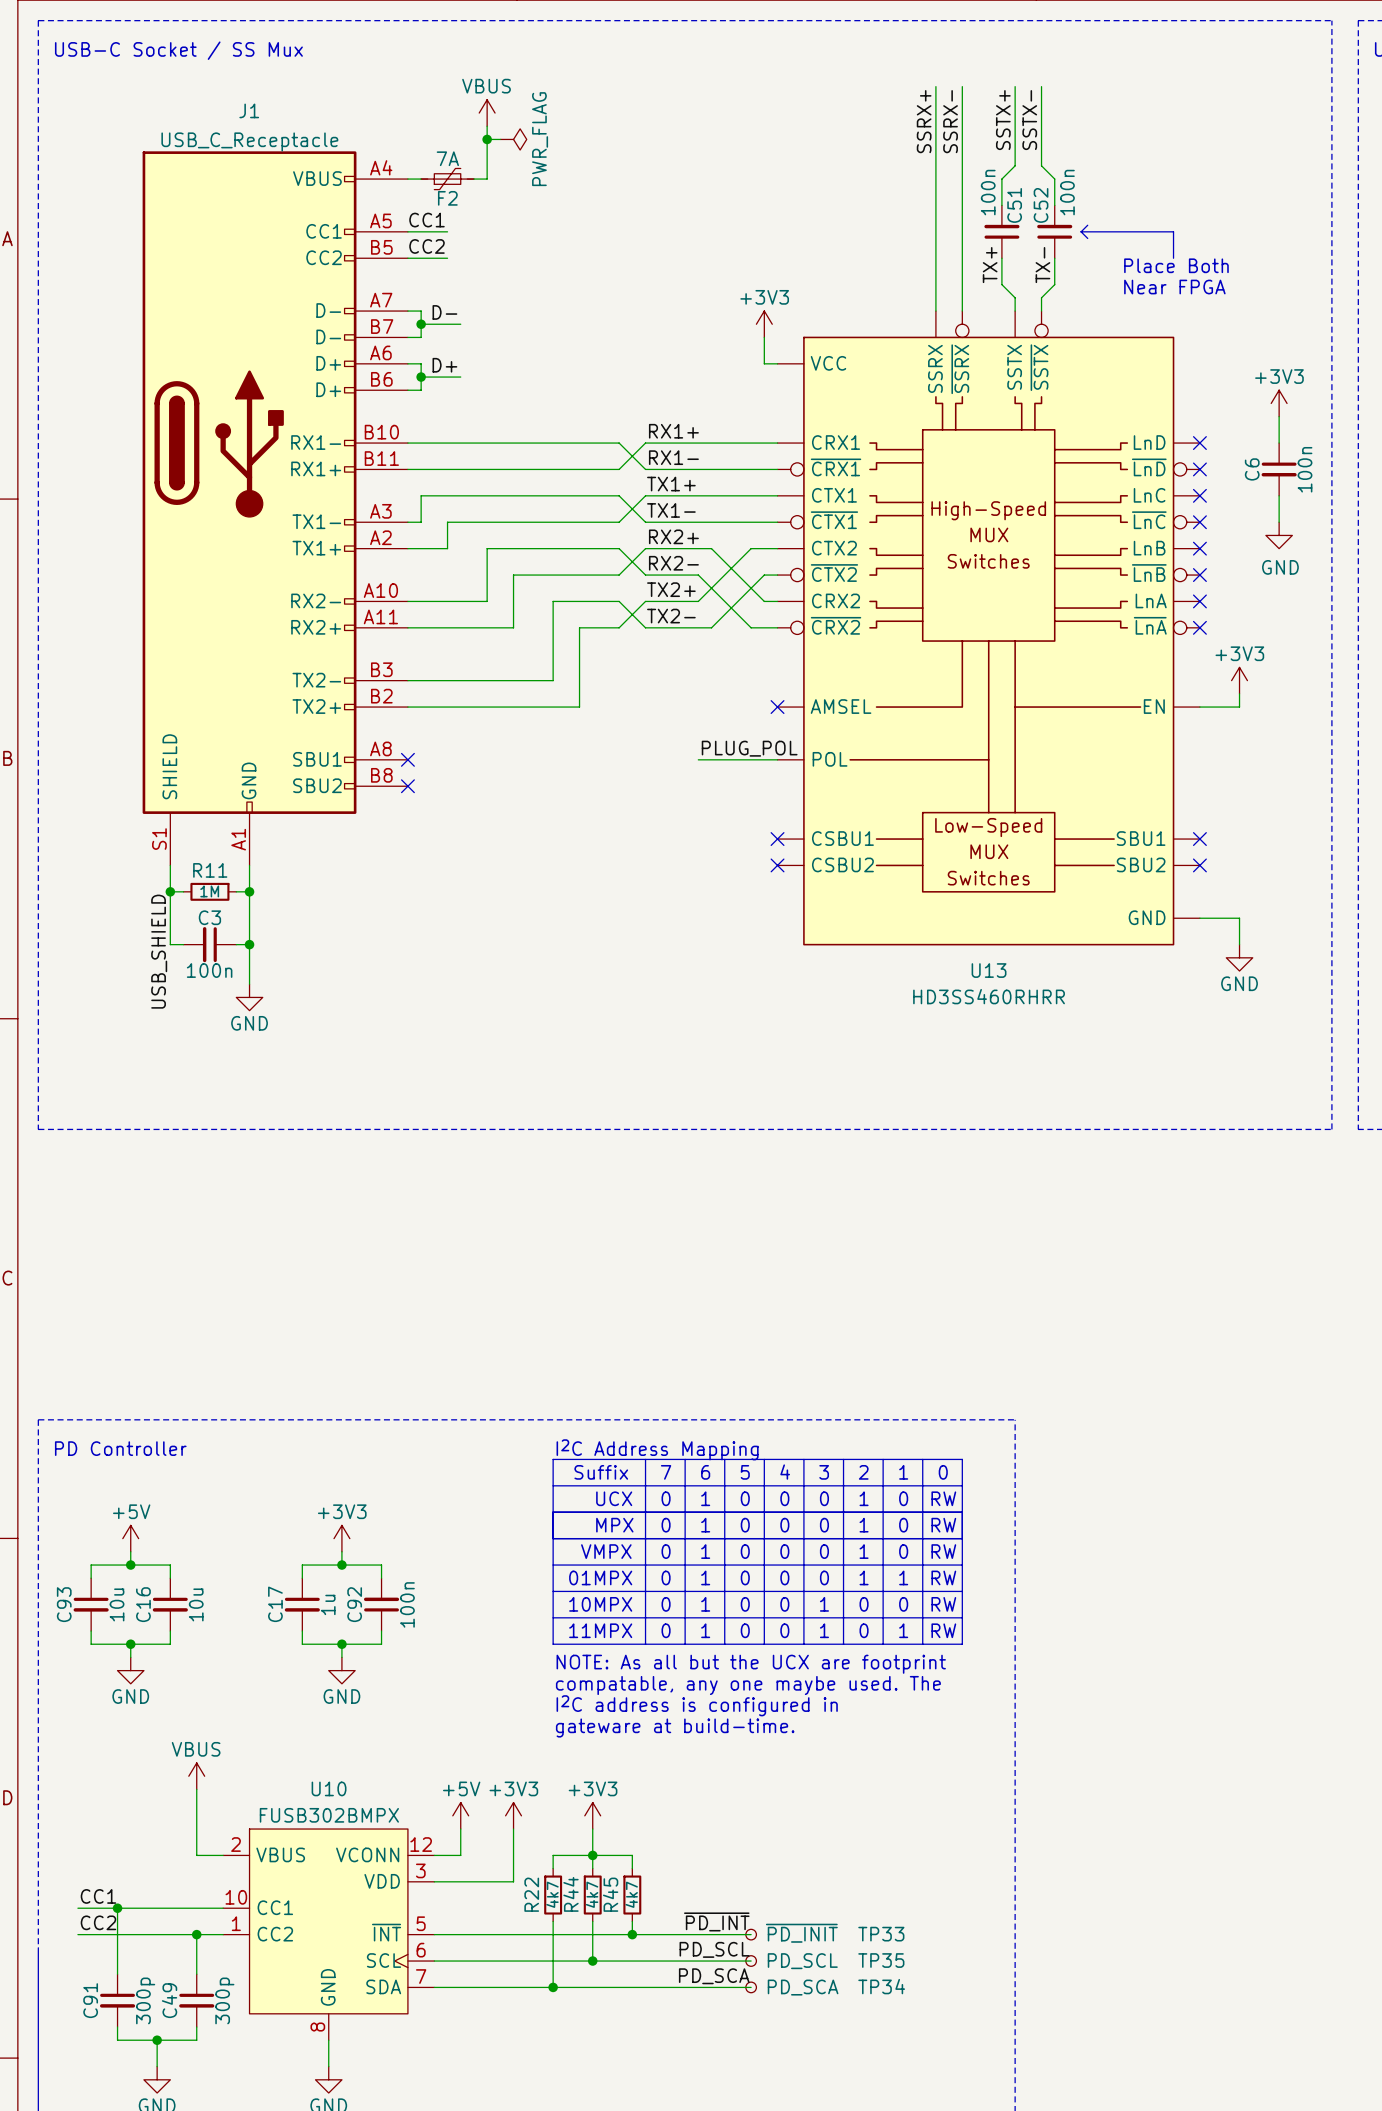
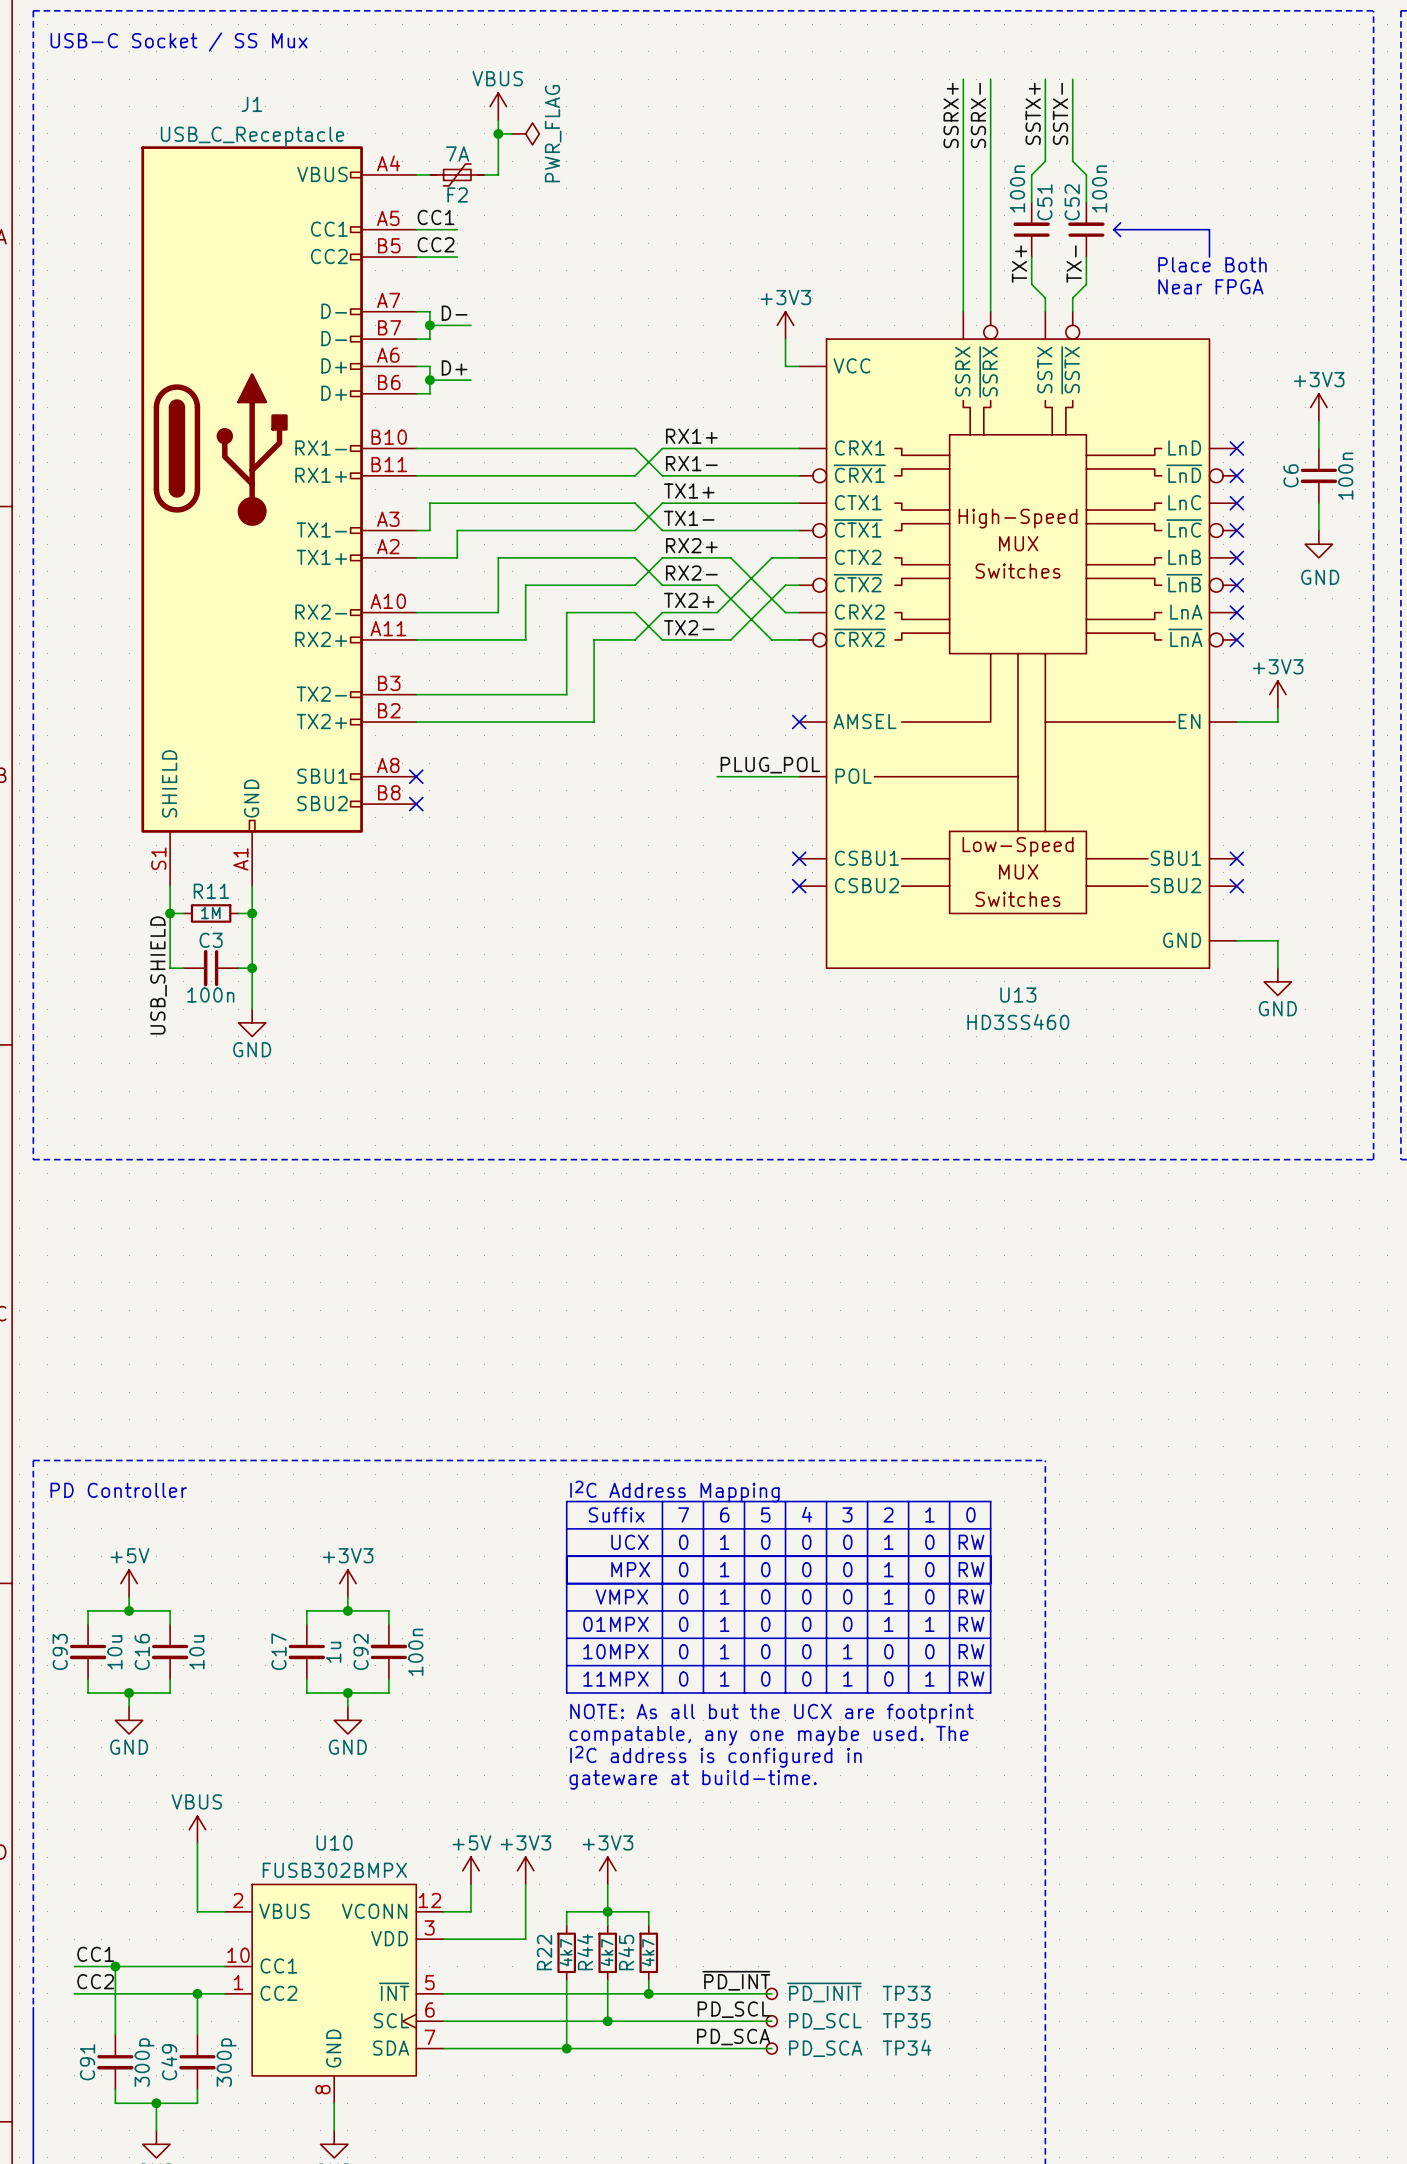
U13 value: HD3SS460RHRR (989, 996) -> HD3SS460 (1018, 1022)

